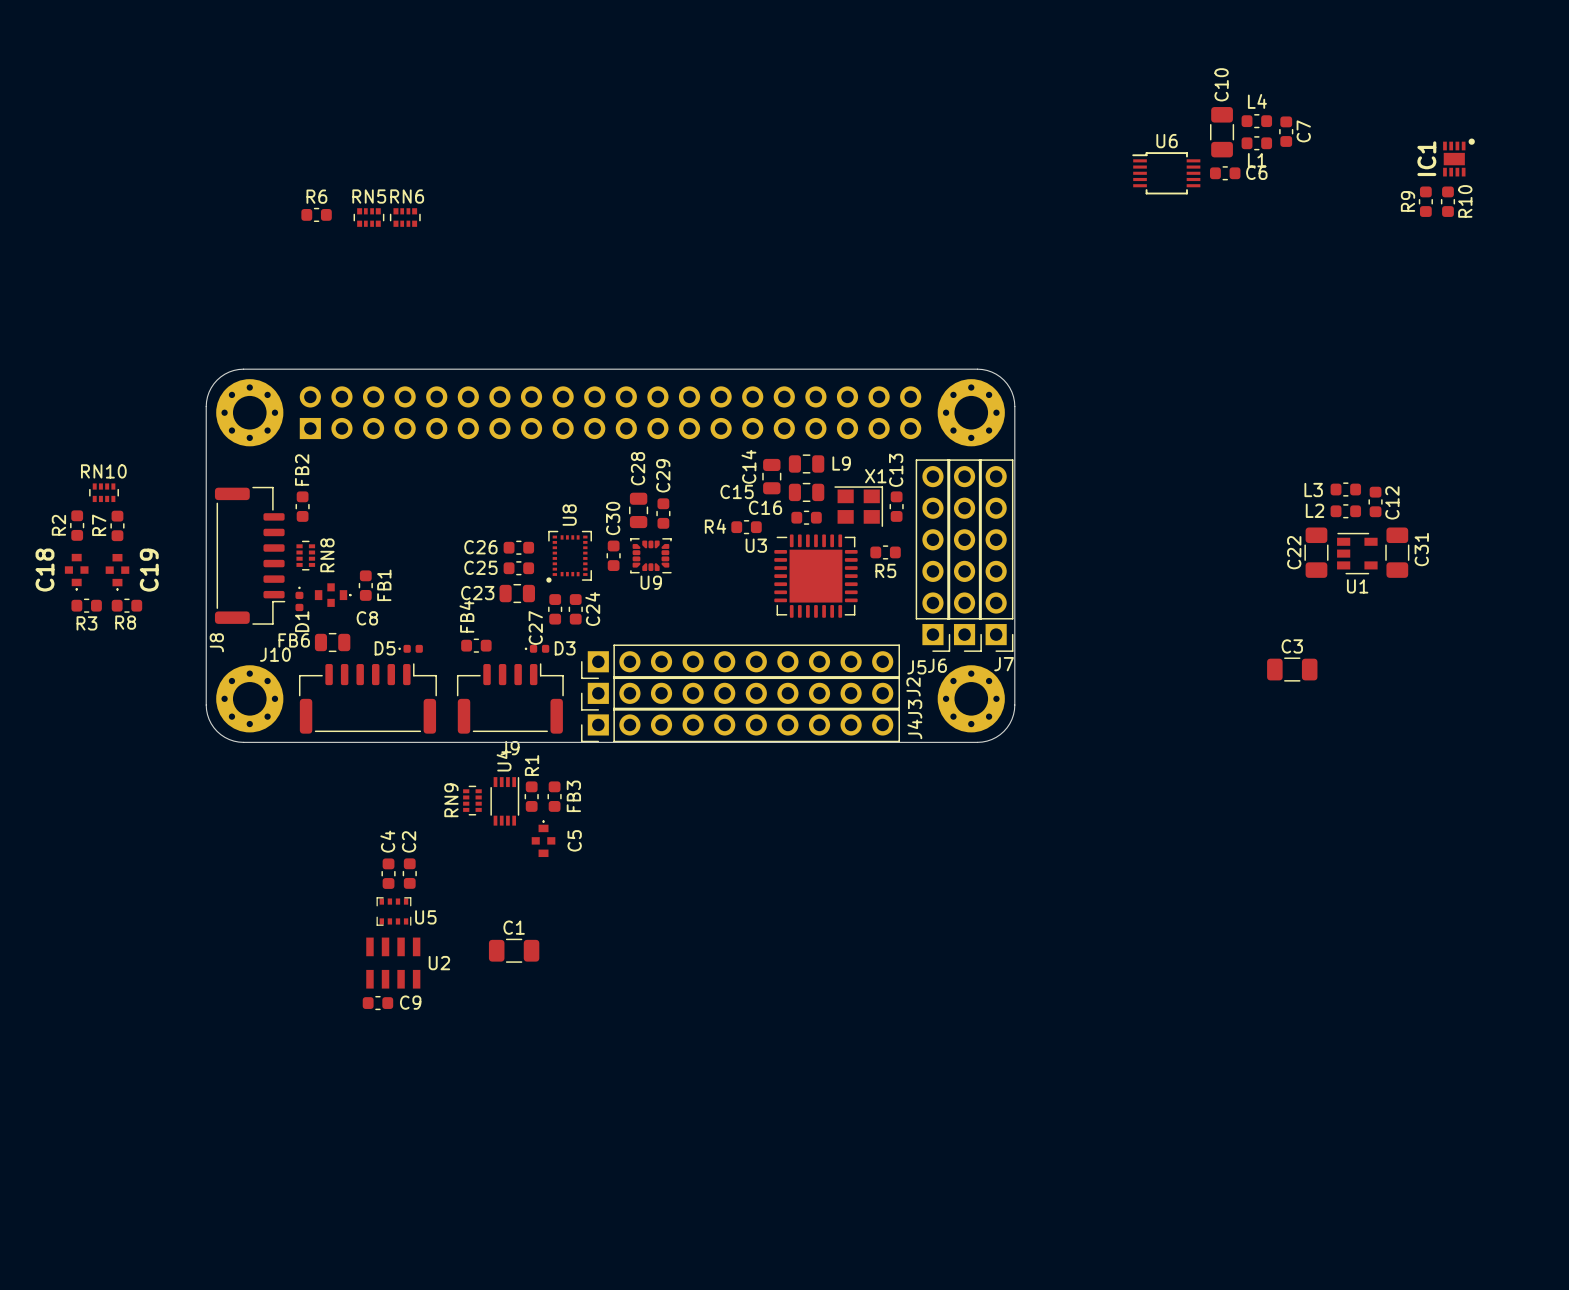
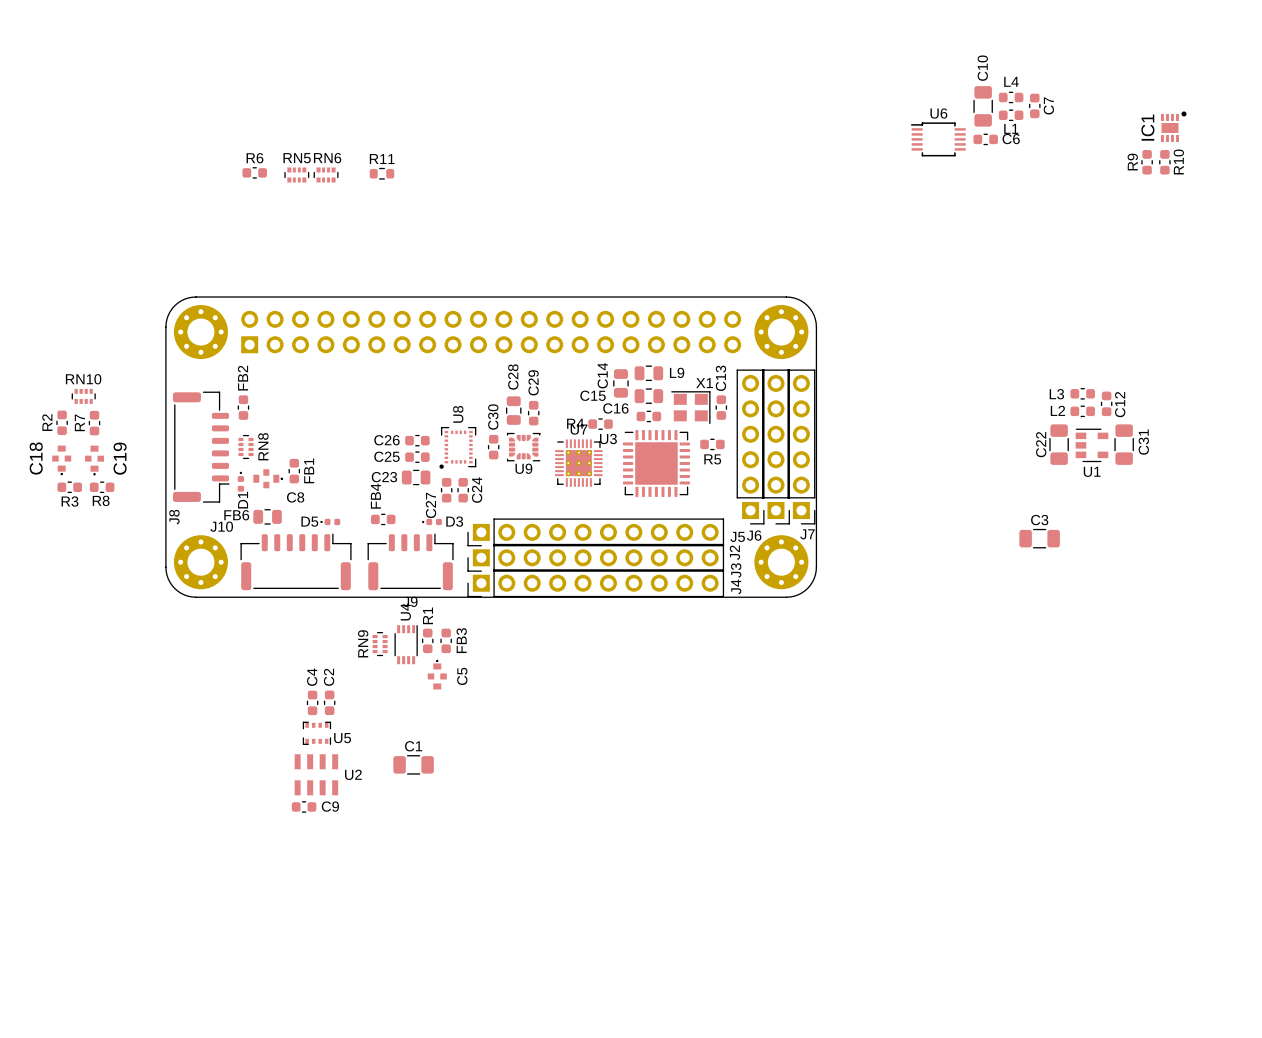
R11: none -> (381, 173)
U7: none -> (578, 463)

